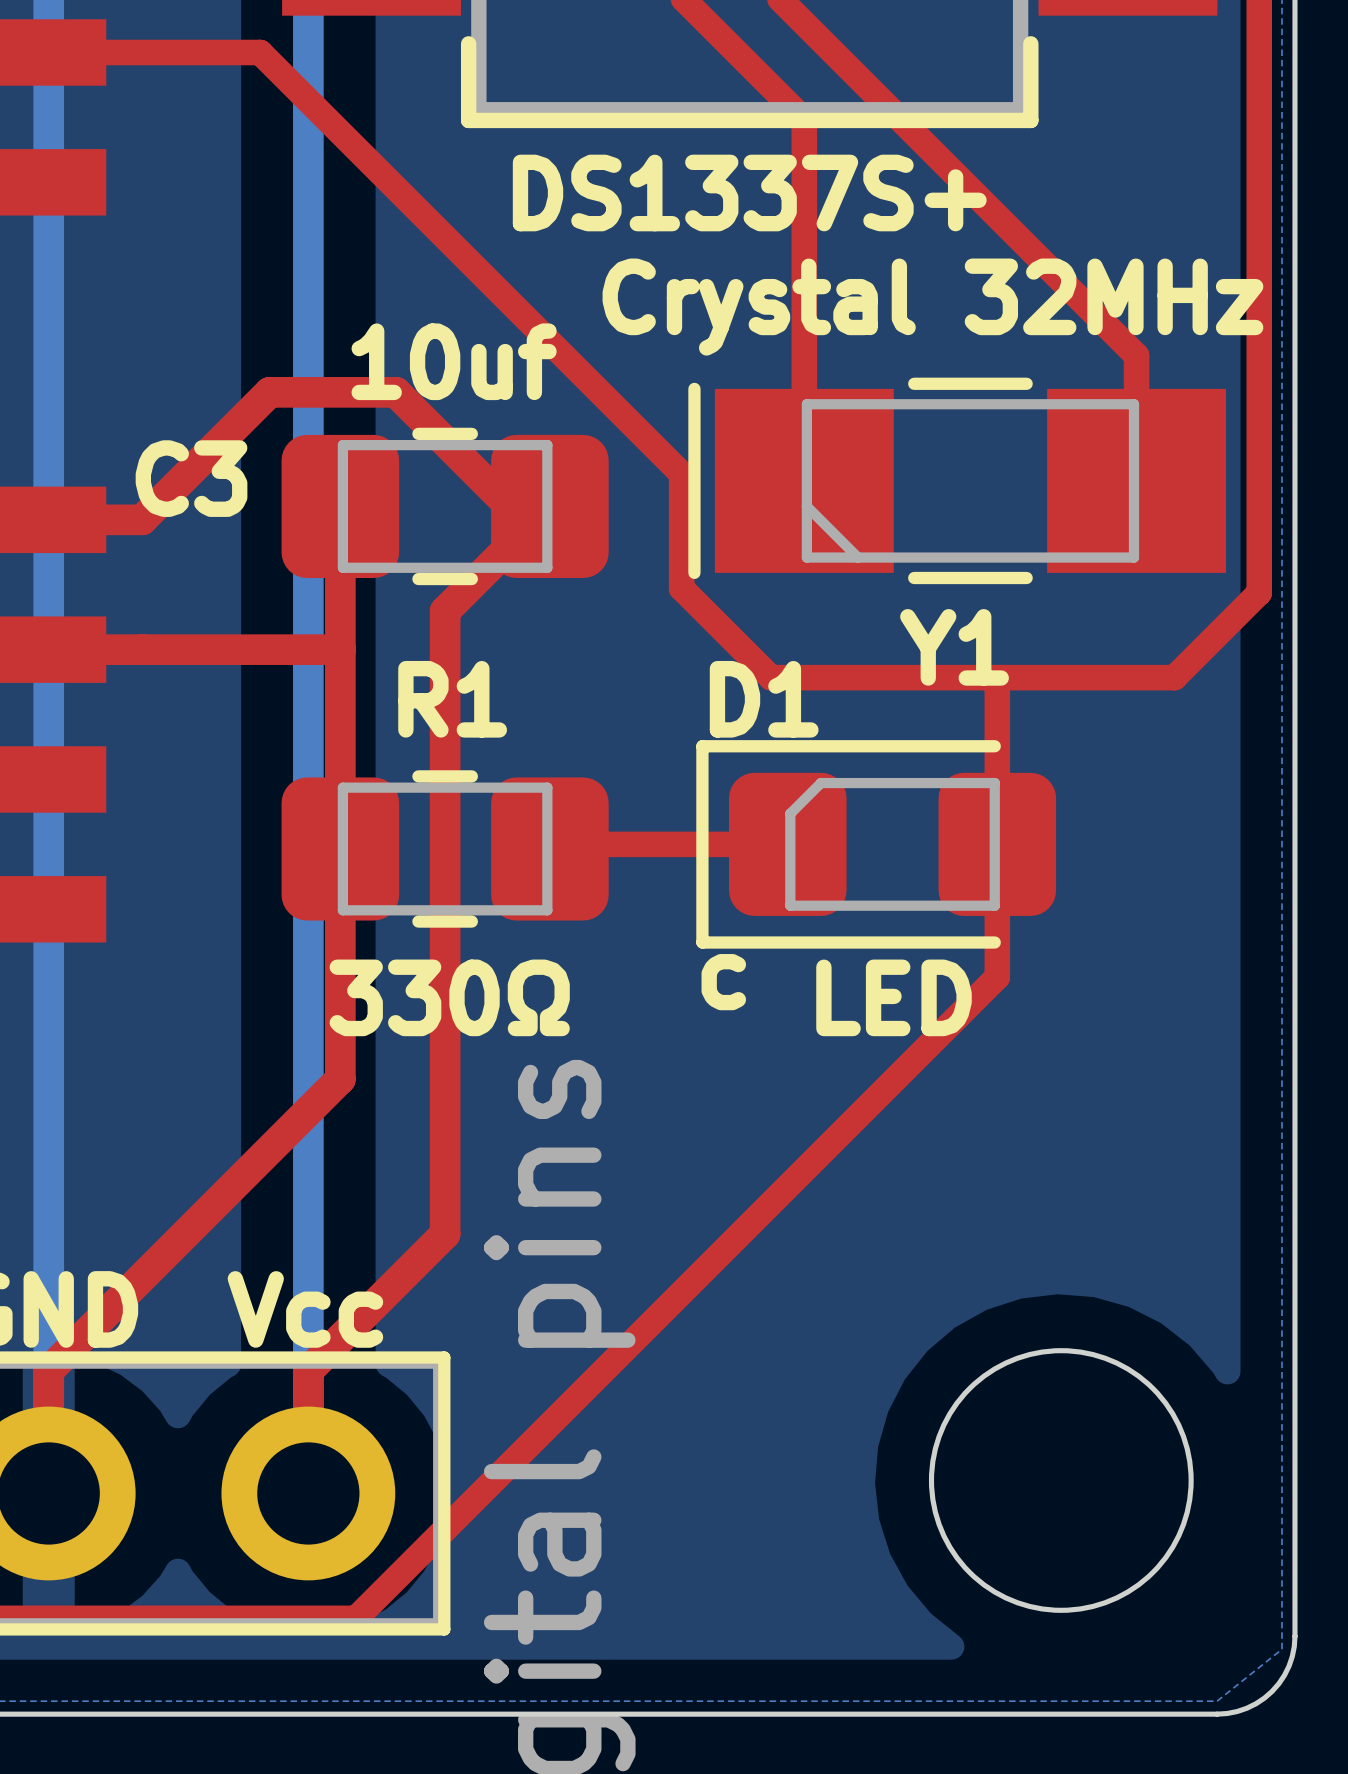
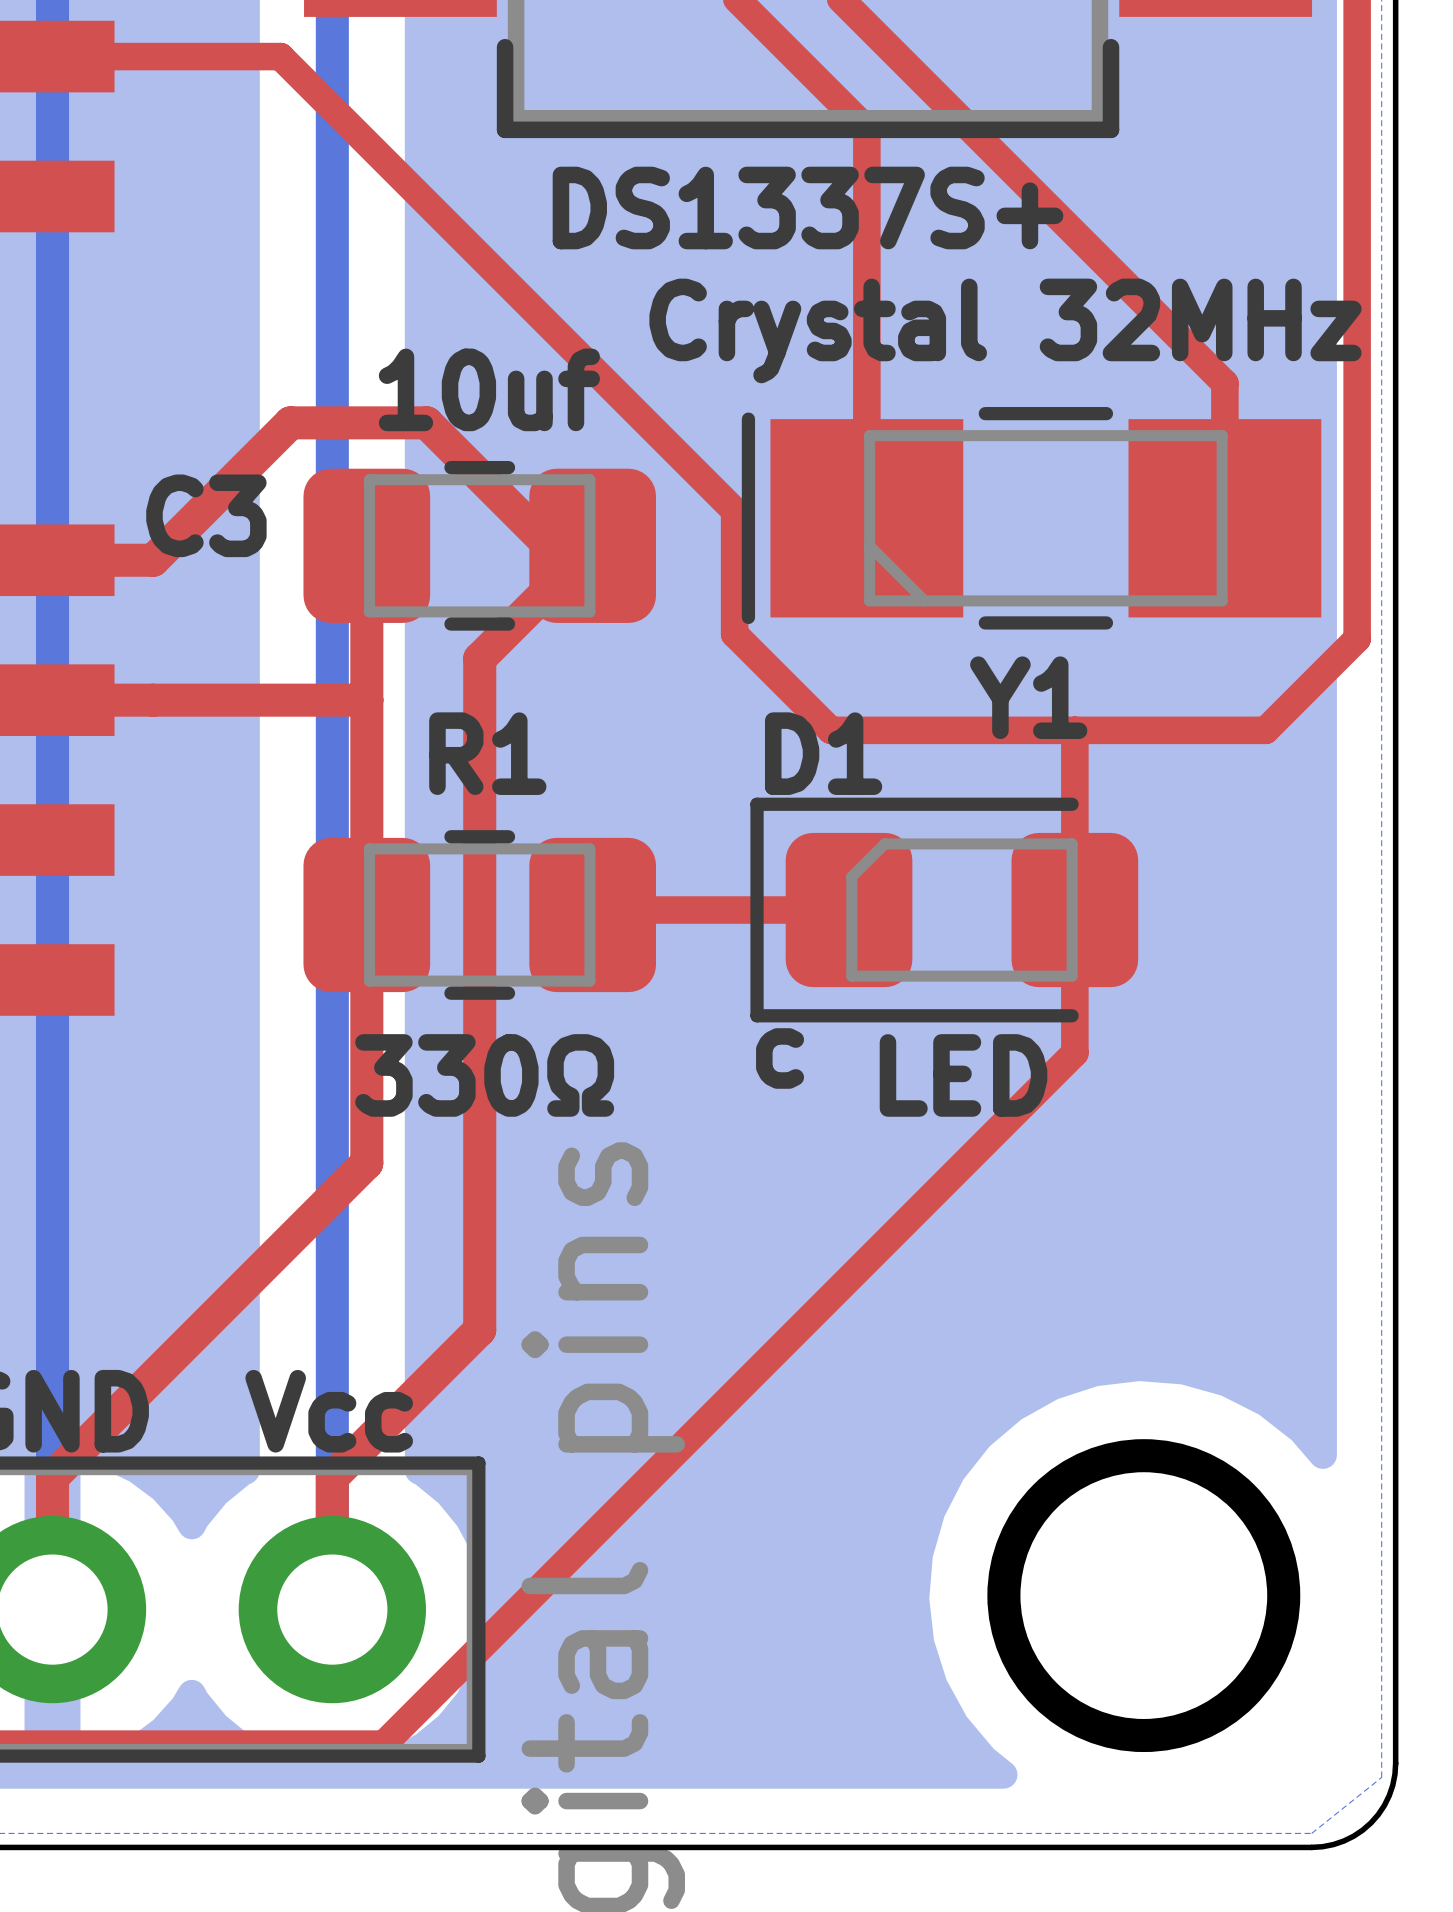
round board edge size: [928, 1348, 1194, 1613] -> [987, 1439, 1301, 1753]

